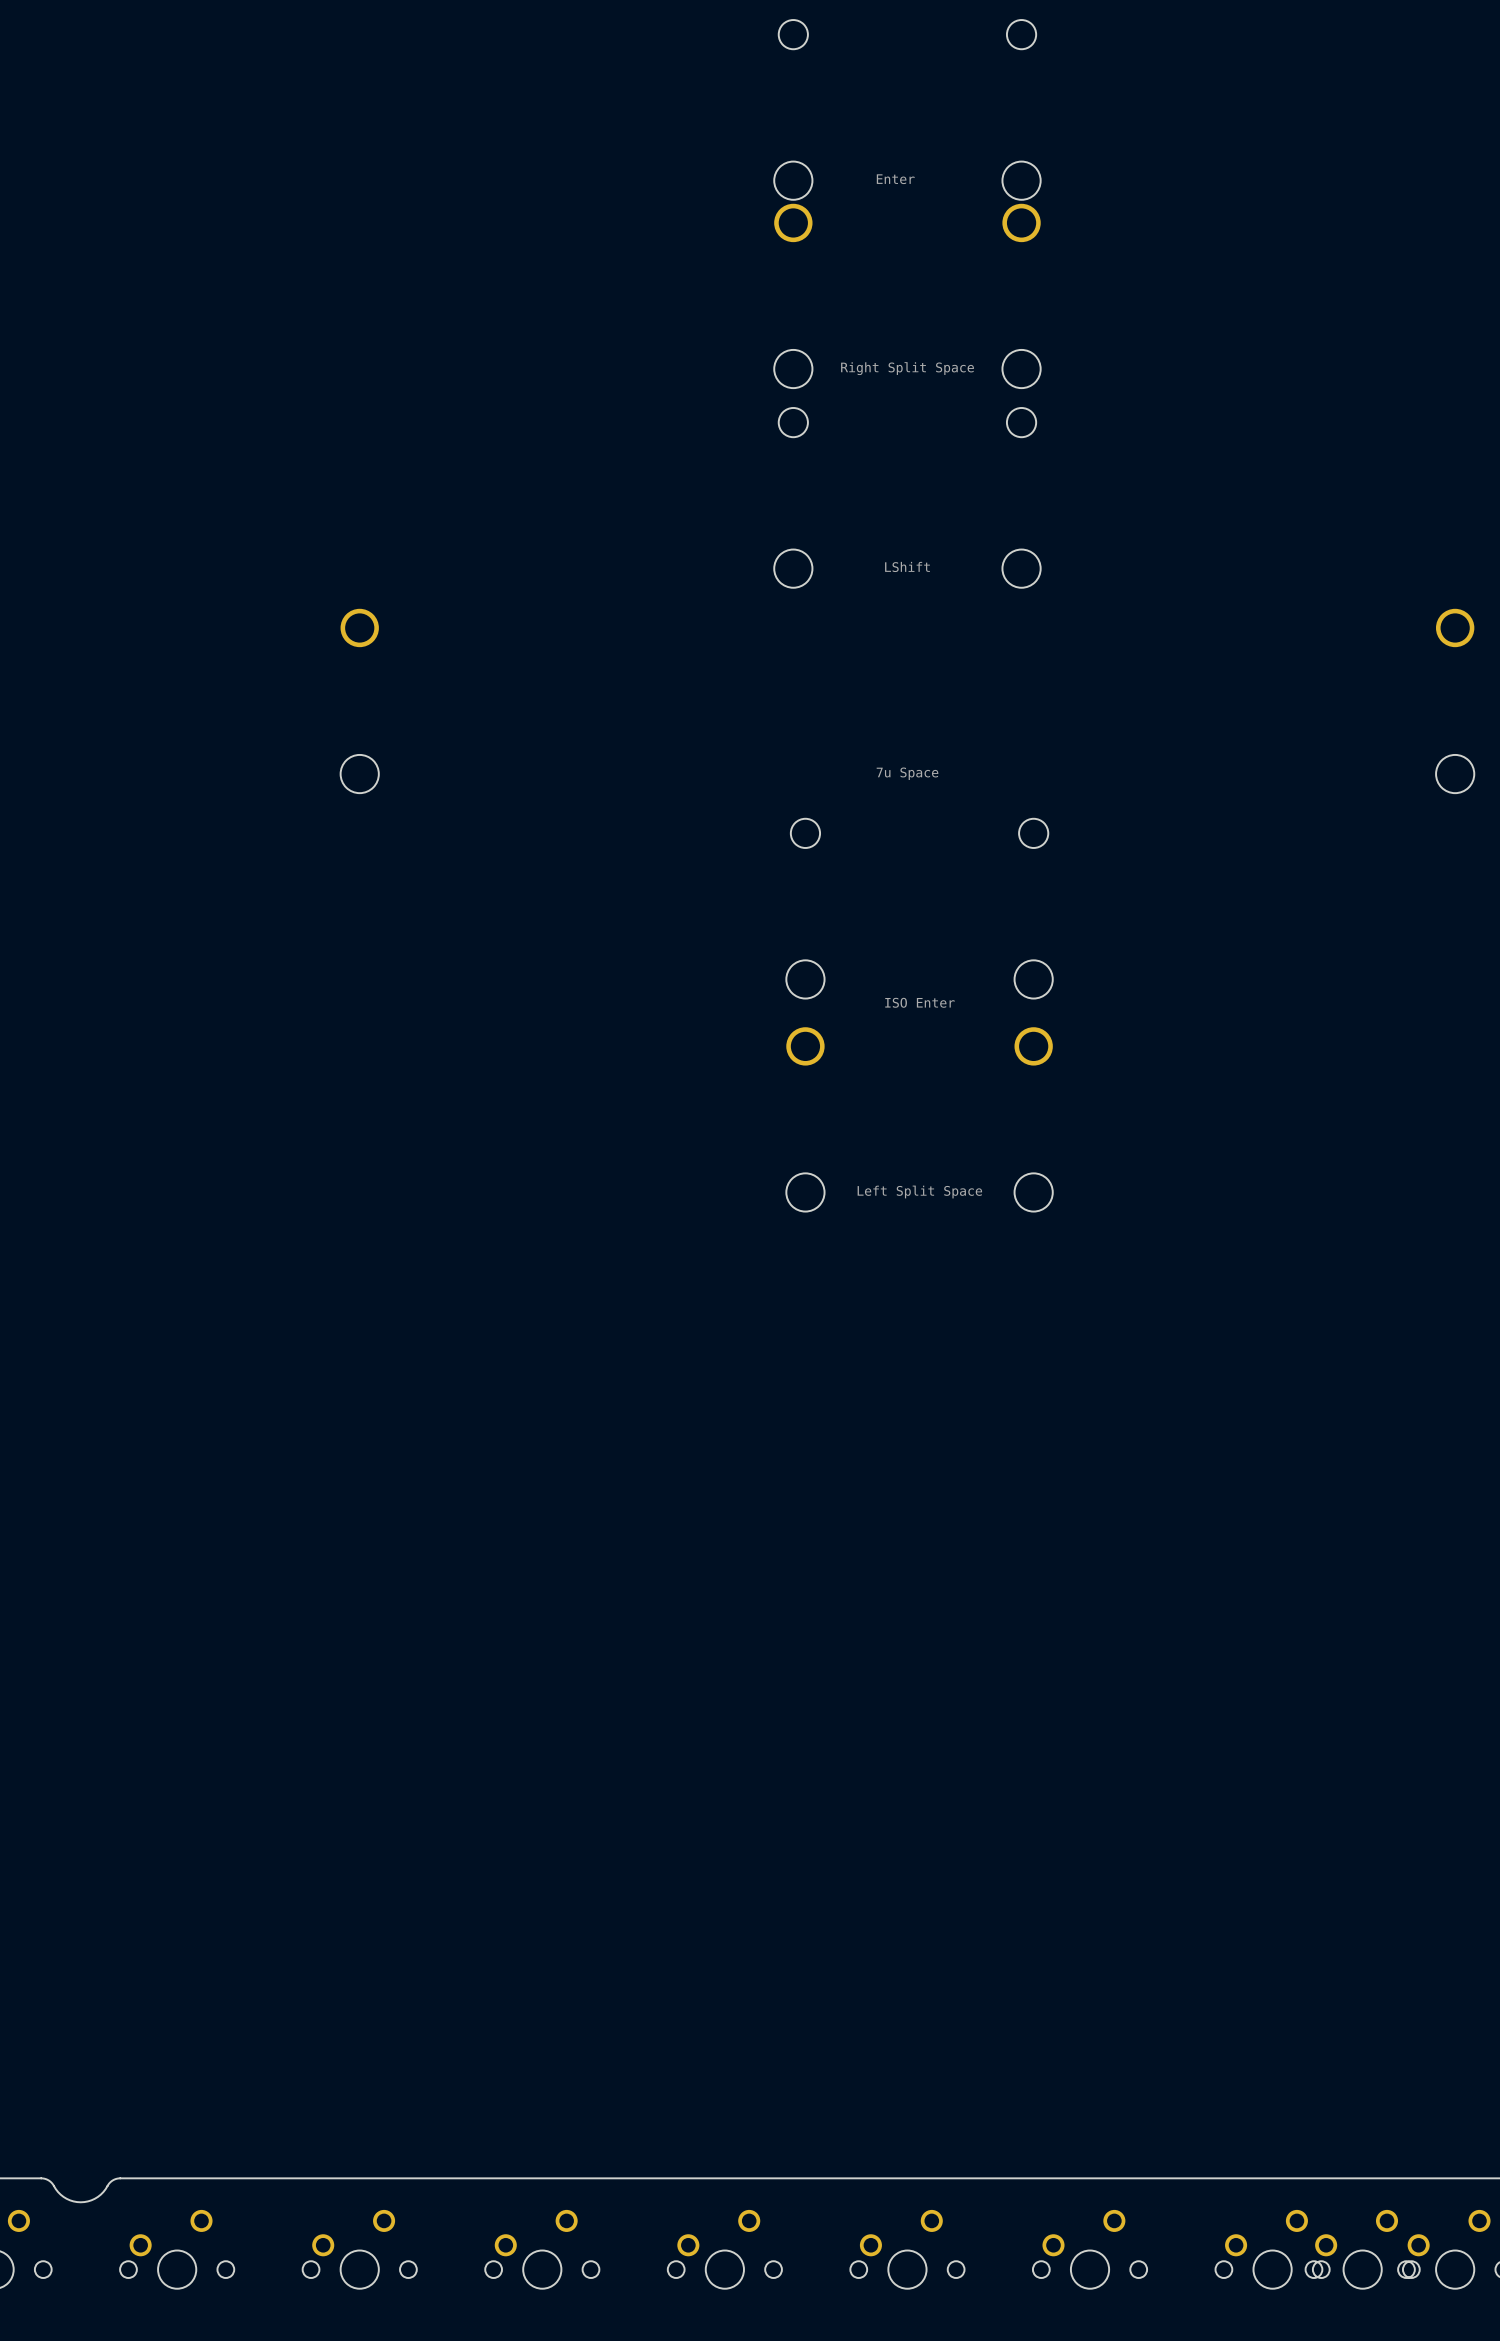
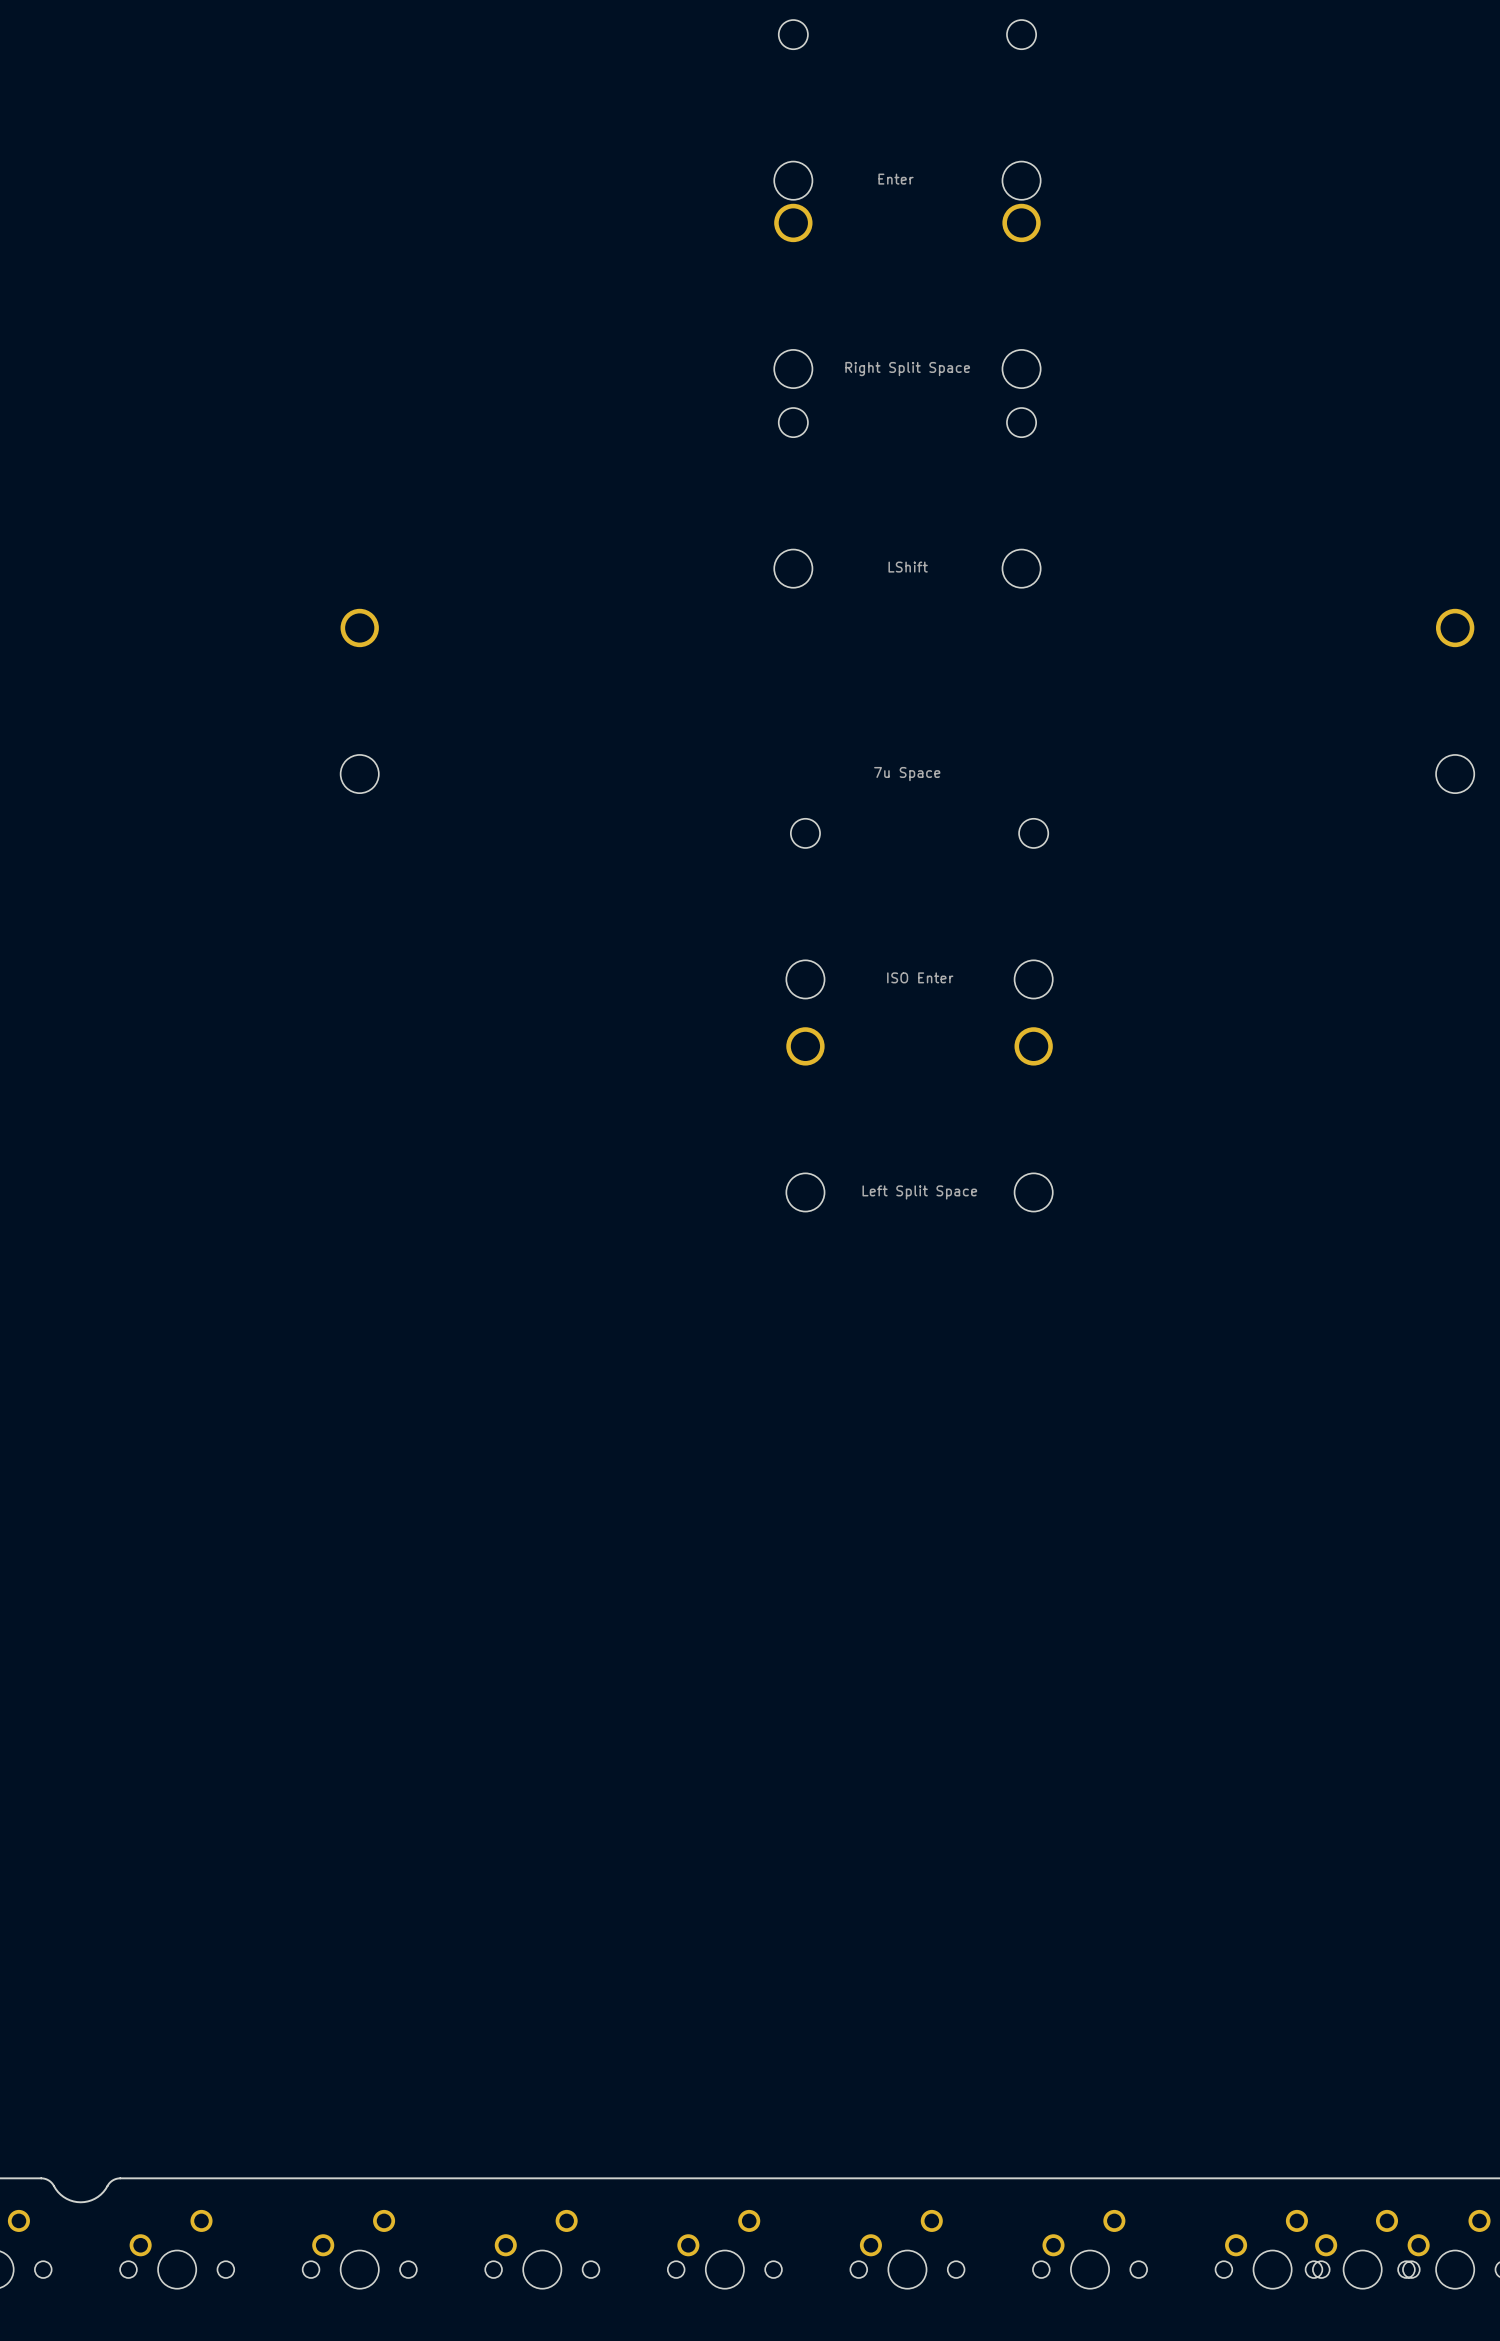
part value position: ISO Enter (919, 1002) -> ISO Enter (920, 977)

